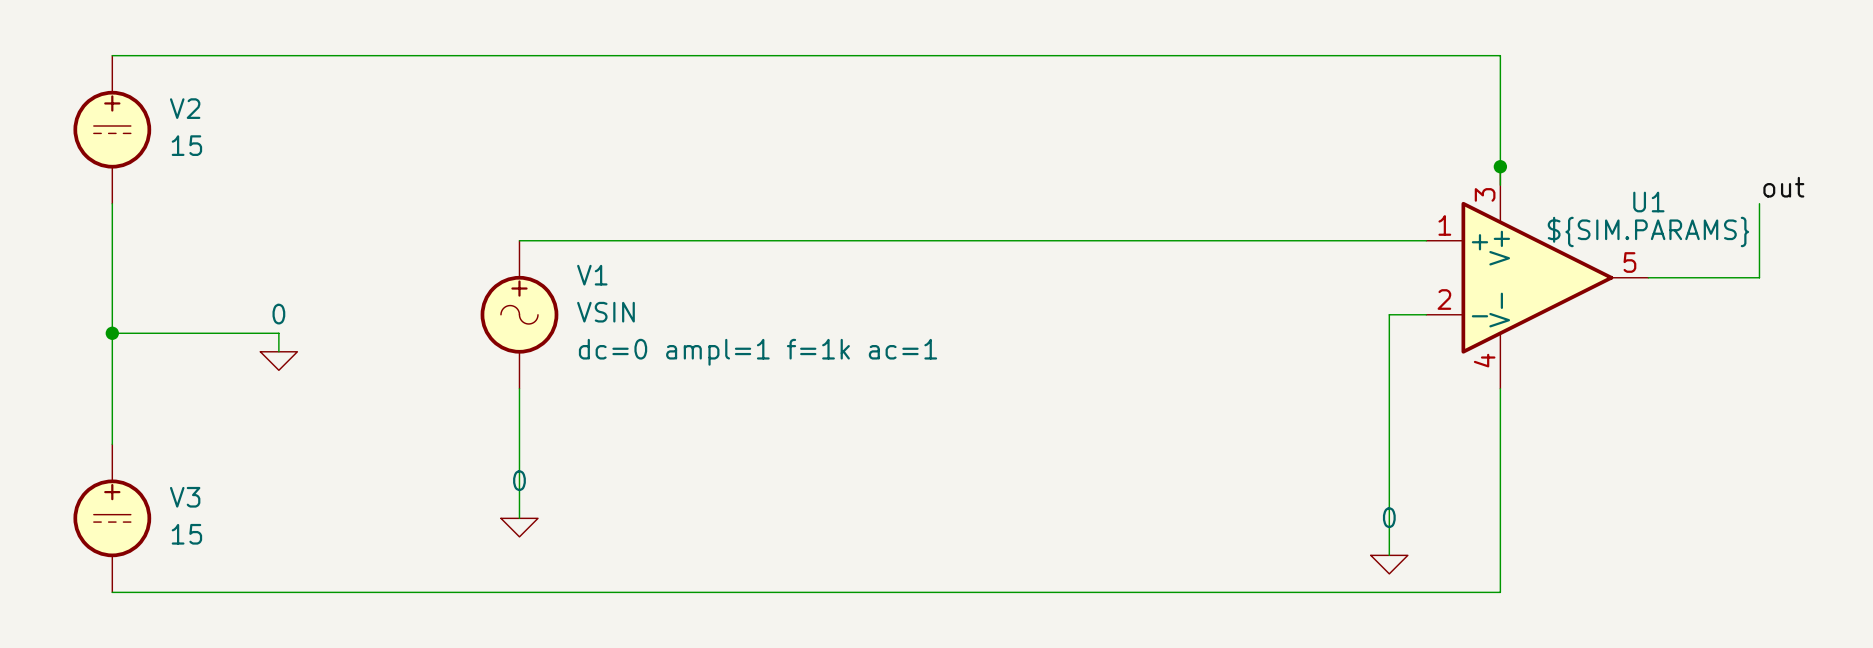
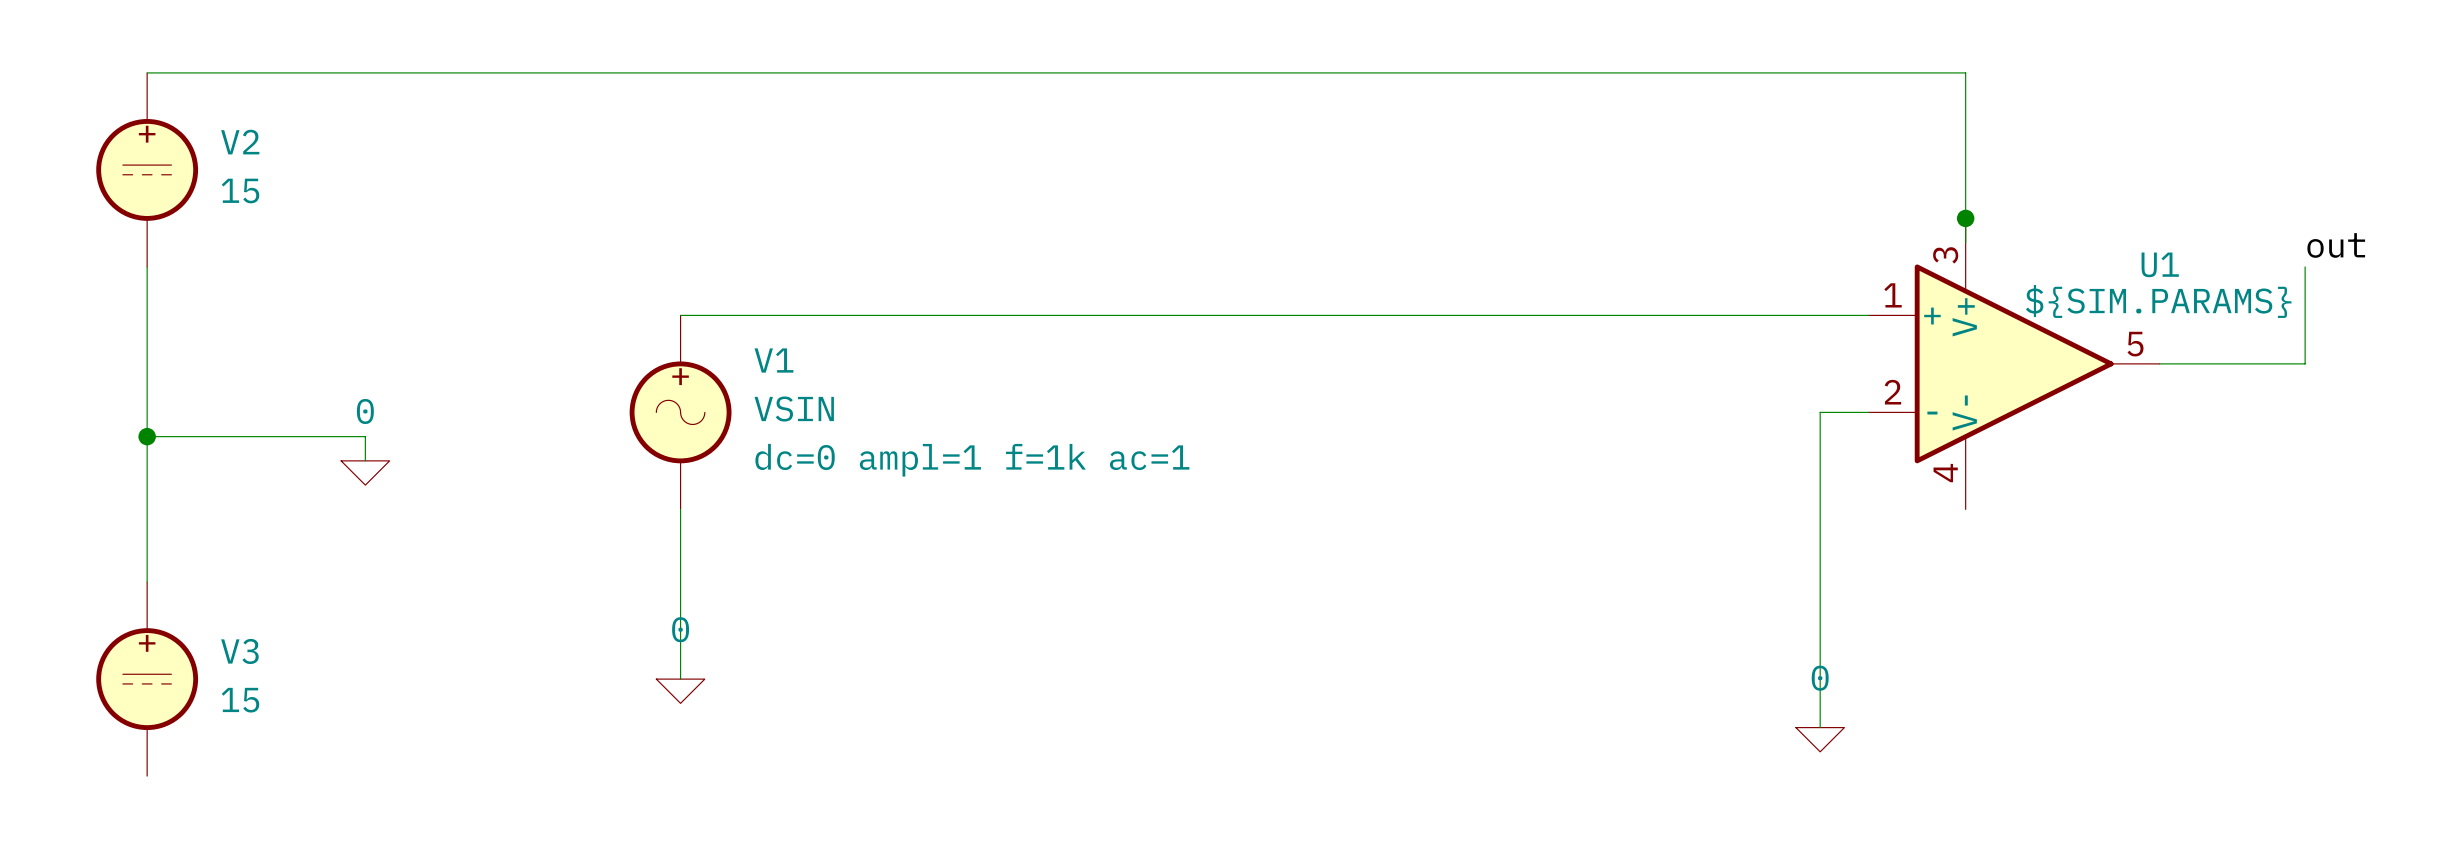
wire: (1500, 388) (1500, 592) (112, 592) -> none

